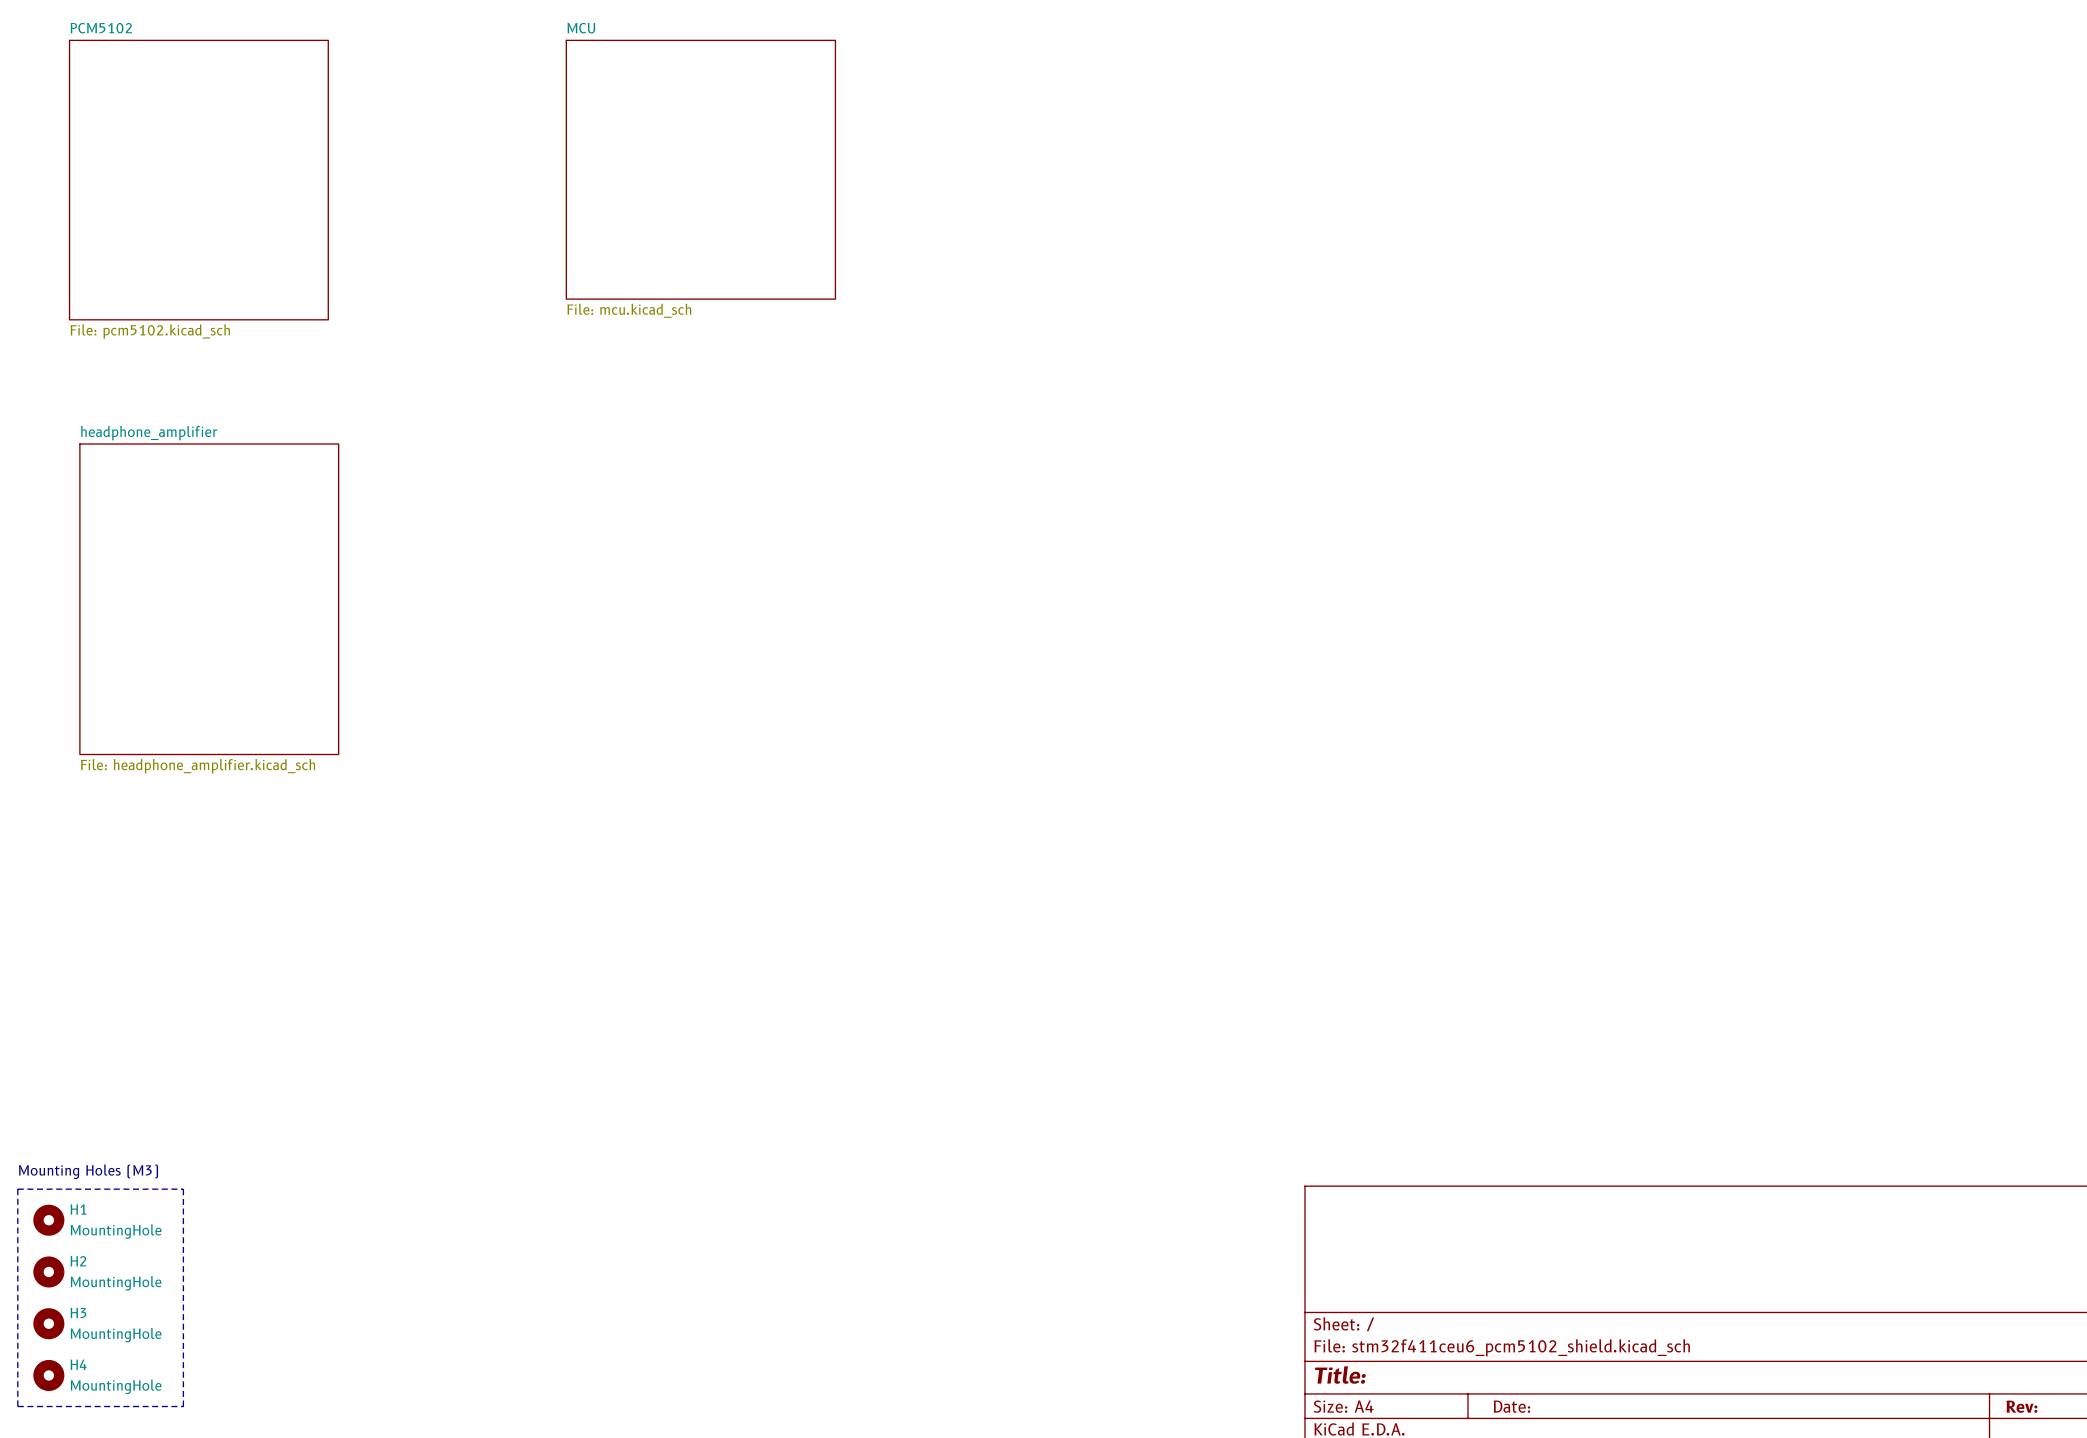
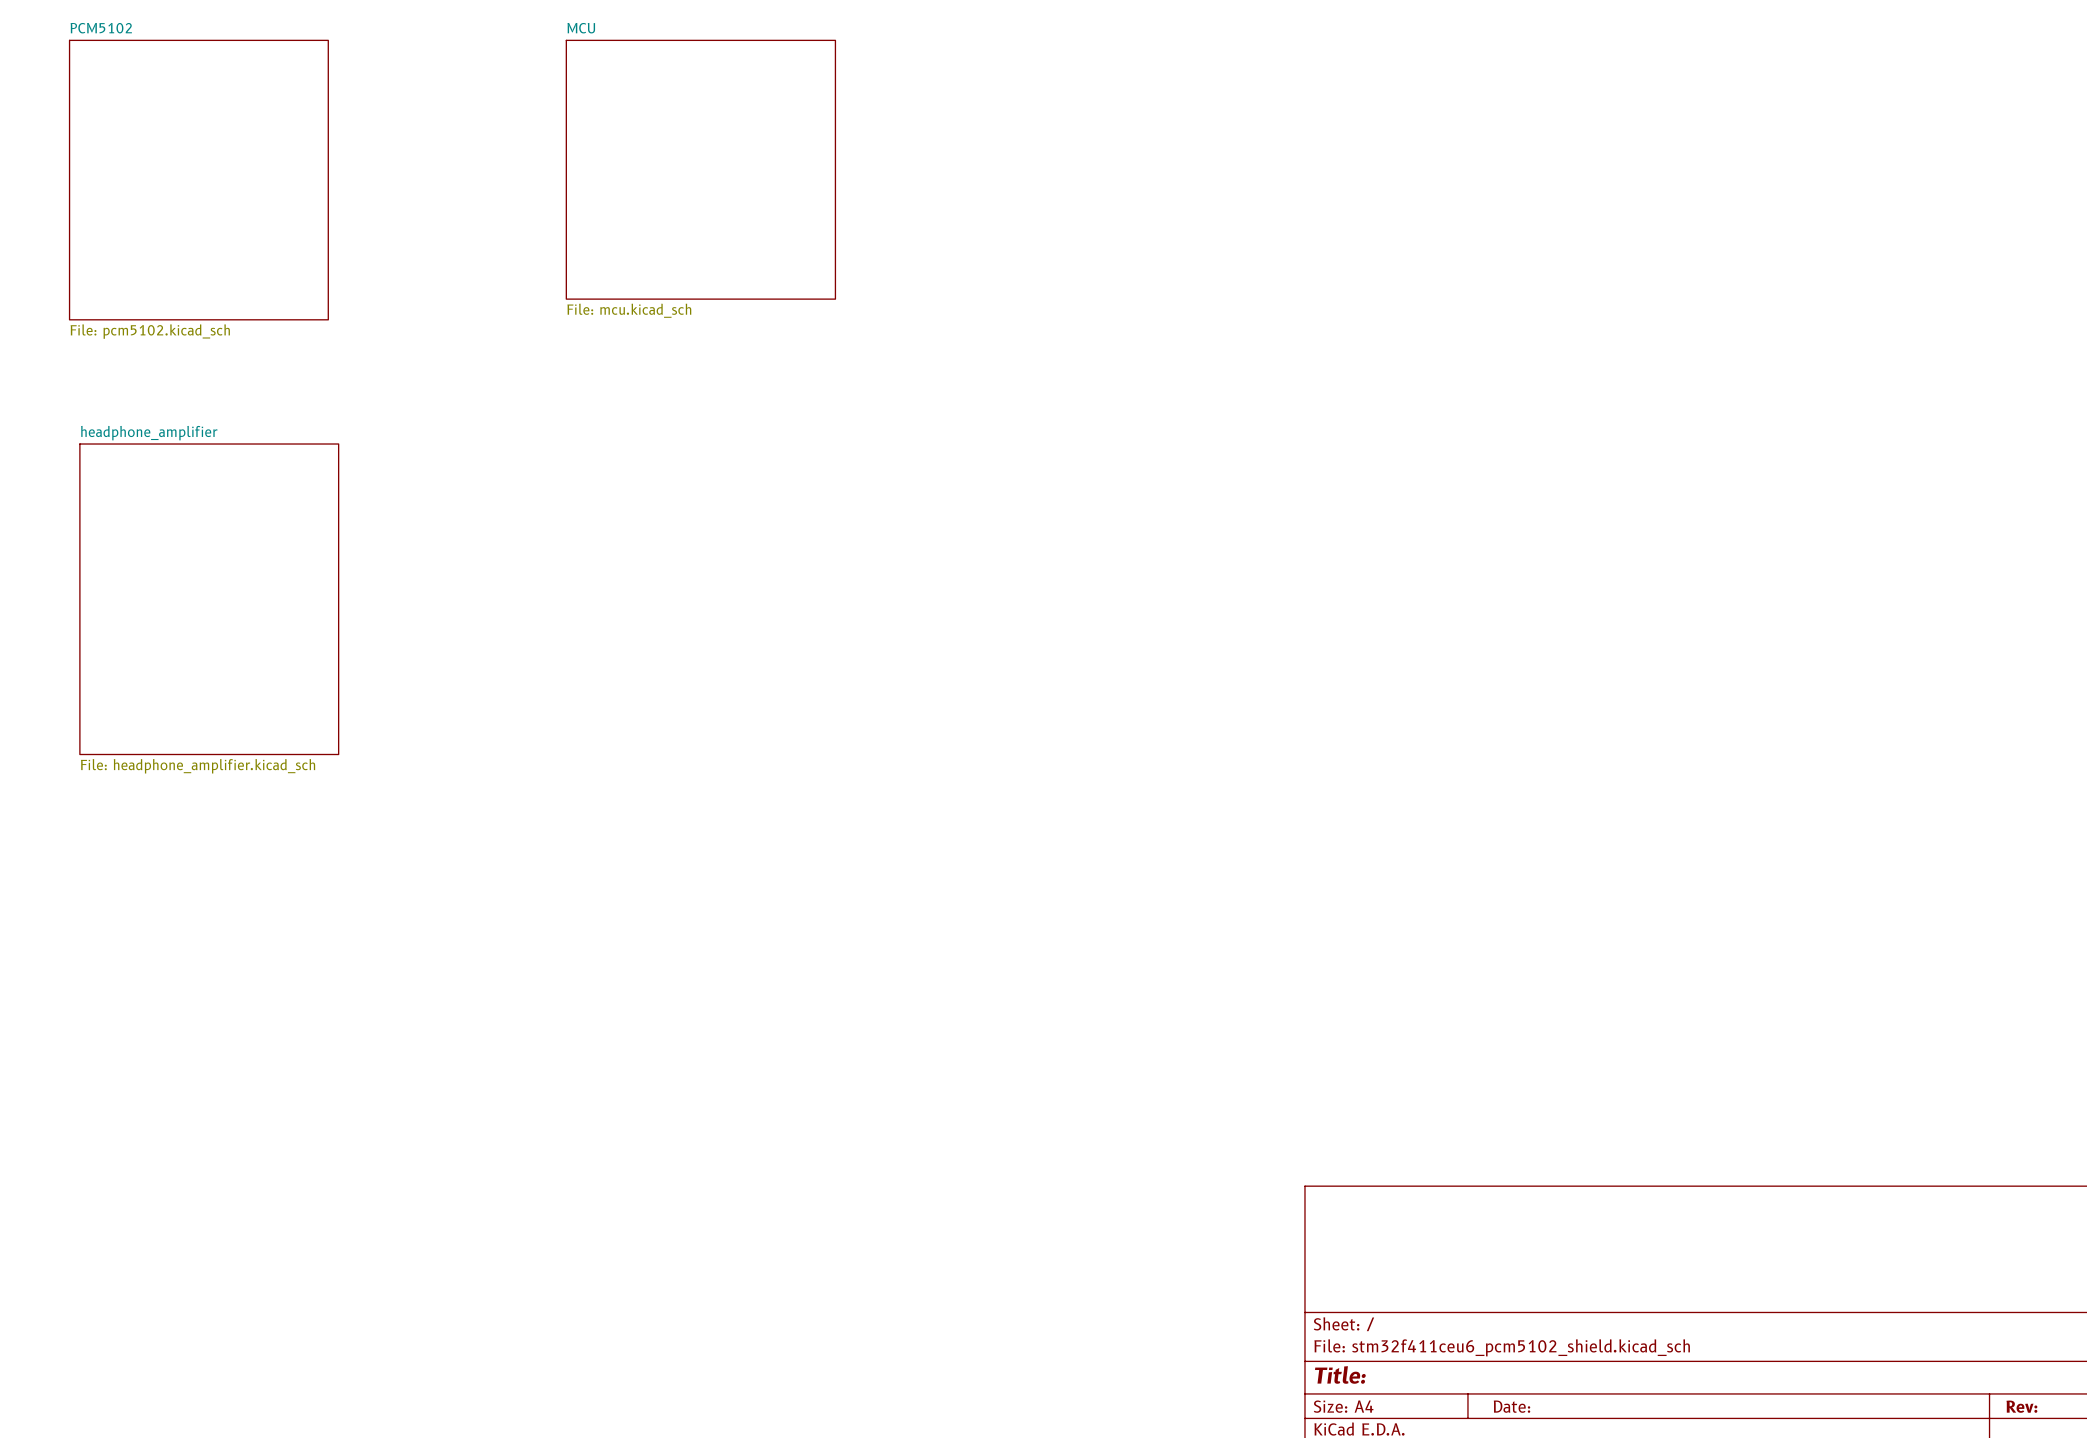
text: Mounting Holes (M3) (88, 1171) -> none
line: (17, 1189) (183, 1189) (183, 1406) (17, 1406) (17, 1189) -> none
H1: MountingHole (48, 1220) -> none
H2: MountingHole (48, 1271) -> none
H3: MountingHole (48, 1323) -> none
H4: MountingHole (48, 1375) -> none

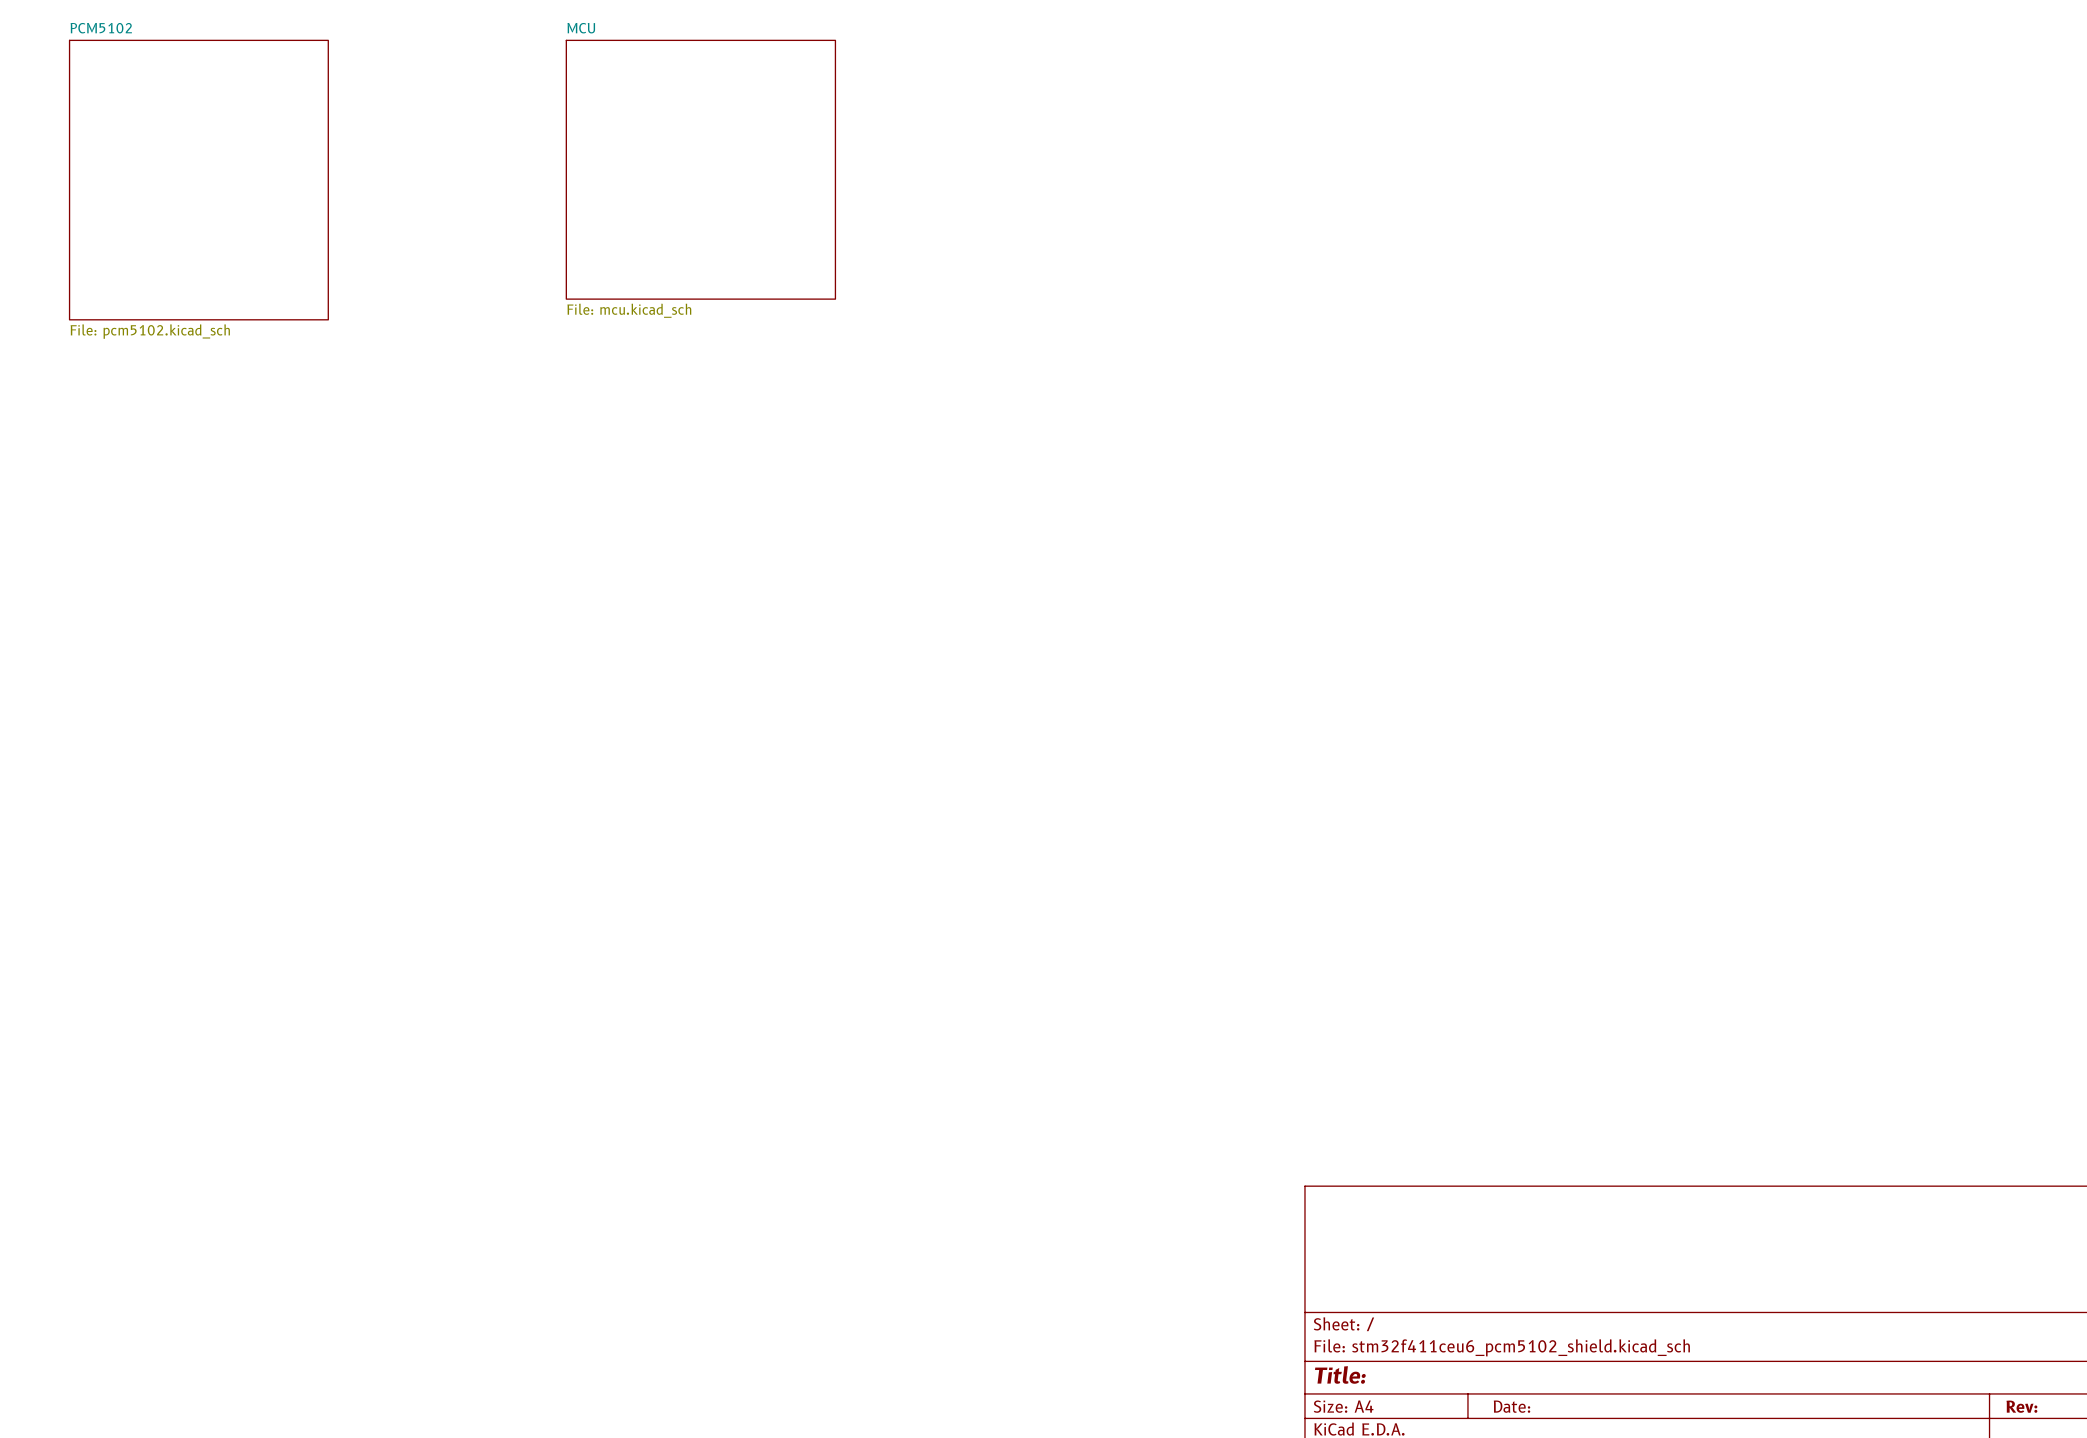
sheet headphone_amplifier: File: headphone_amplifier.kicad_sch (209, 599) -> none

